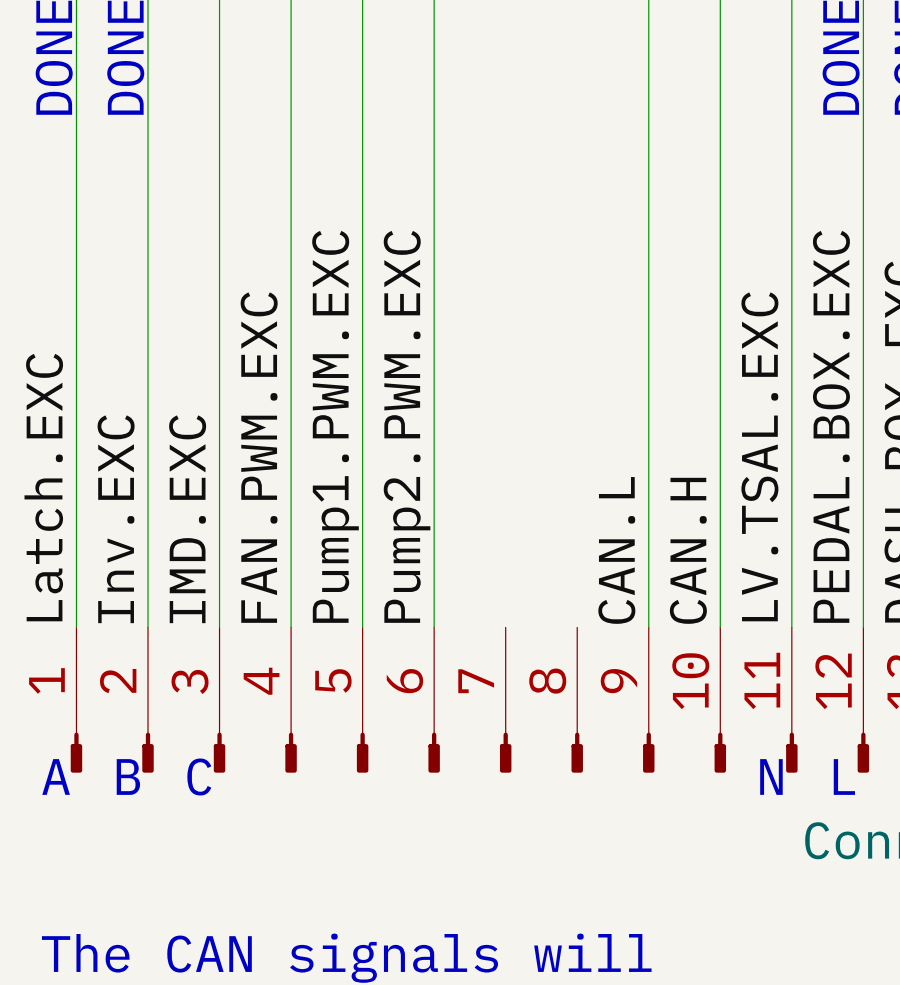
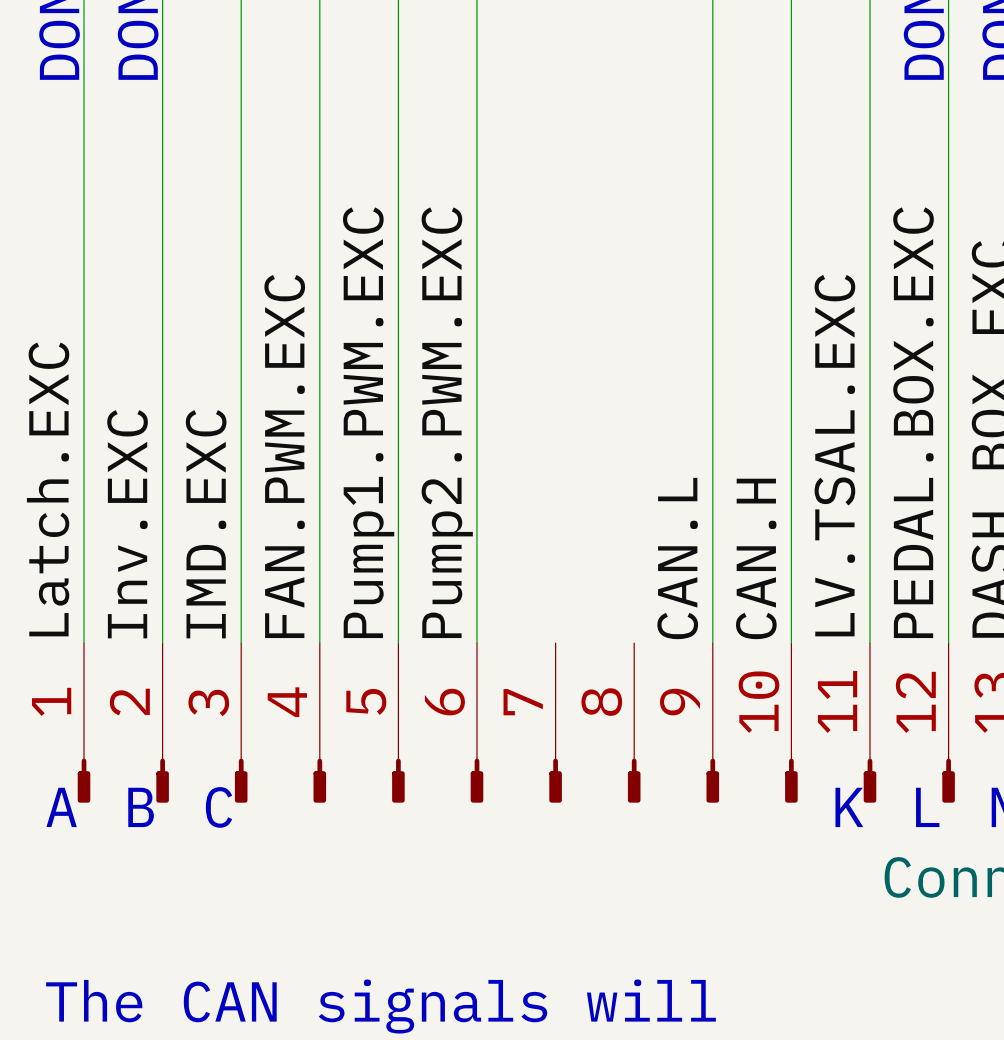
text: N (771, 776) -> K (849, 807)

